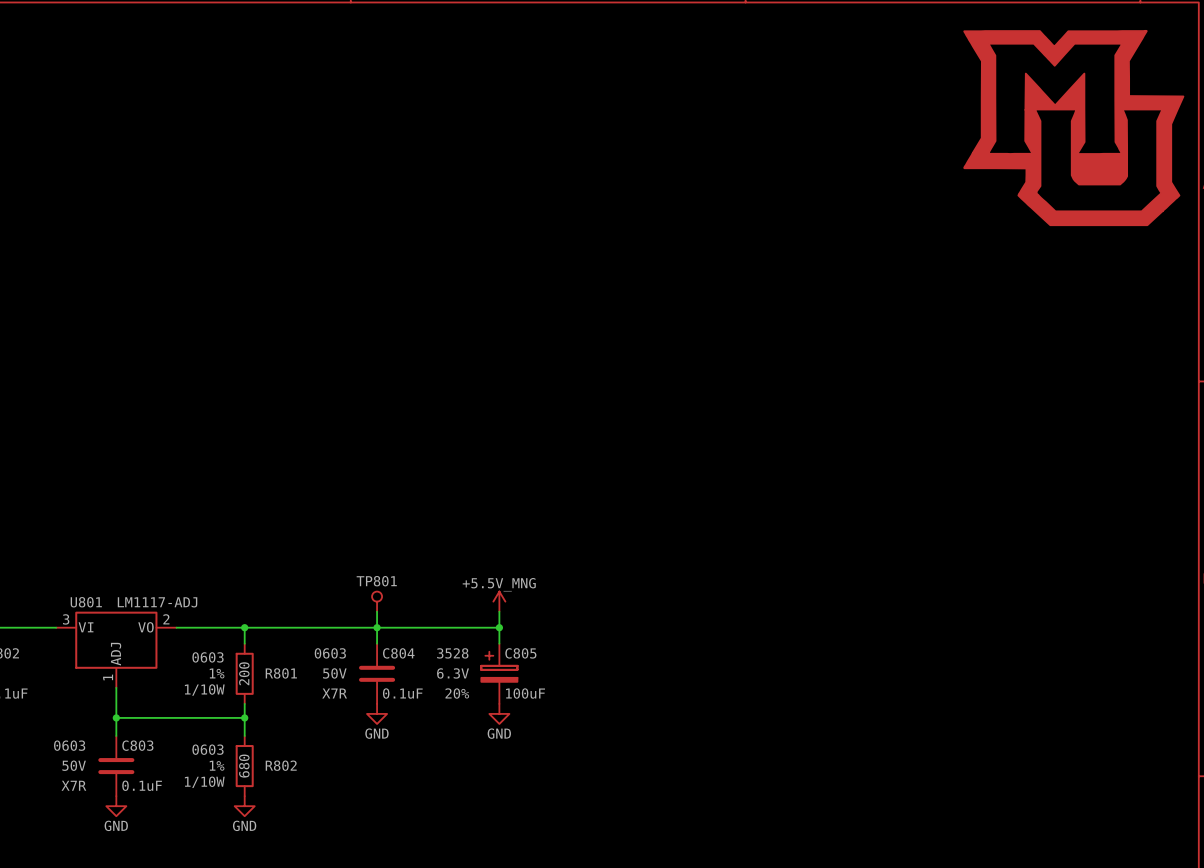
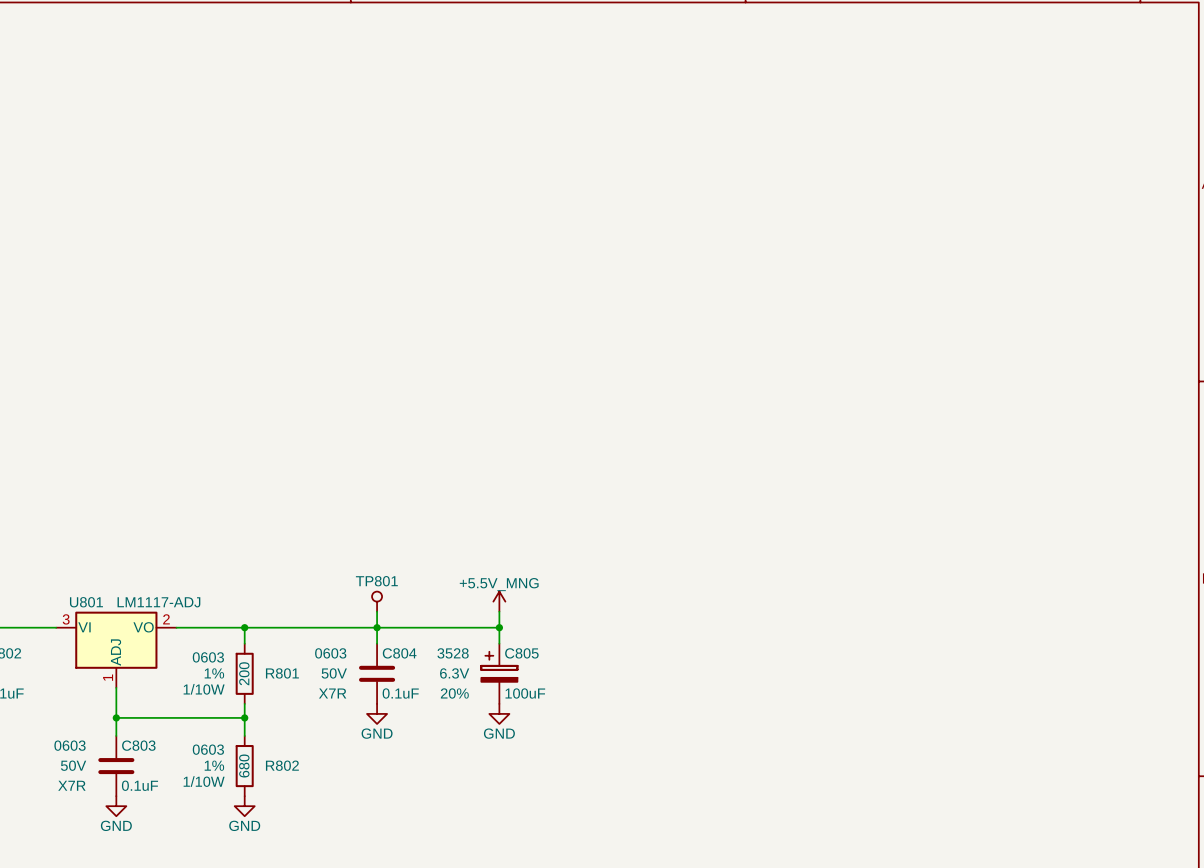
power symbol: (1073, 128) -> none

